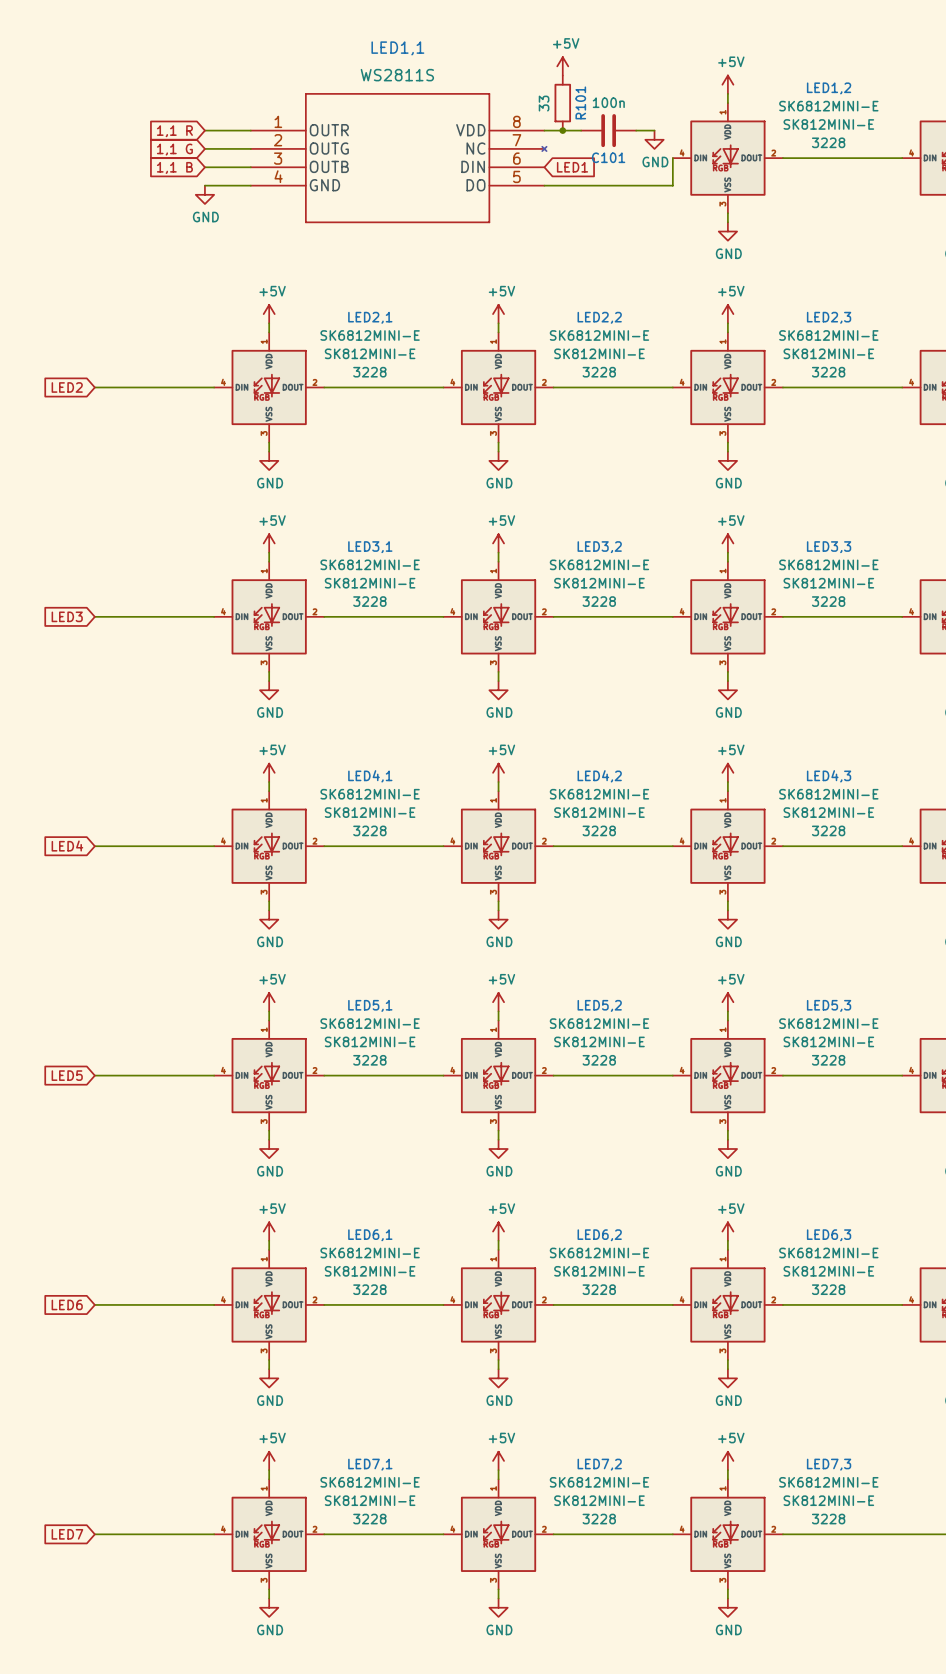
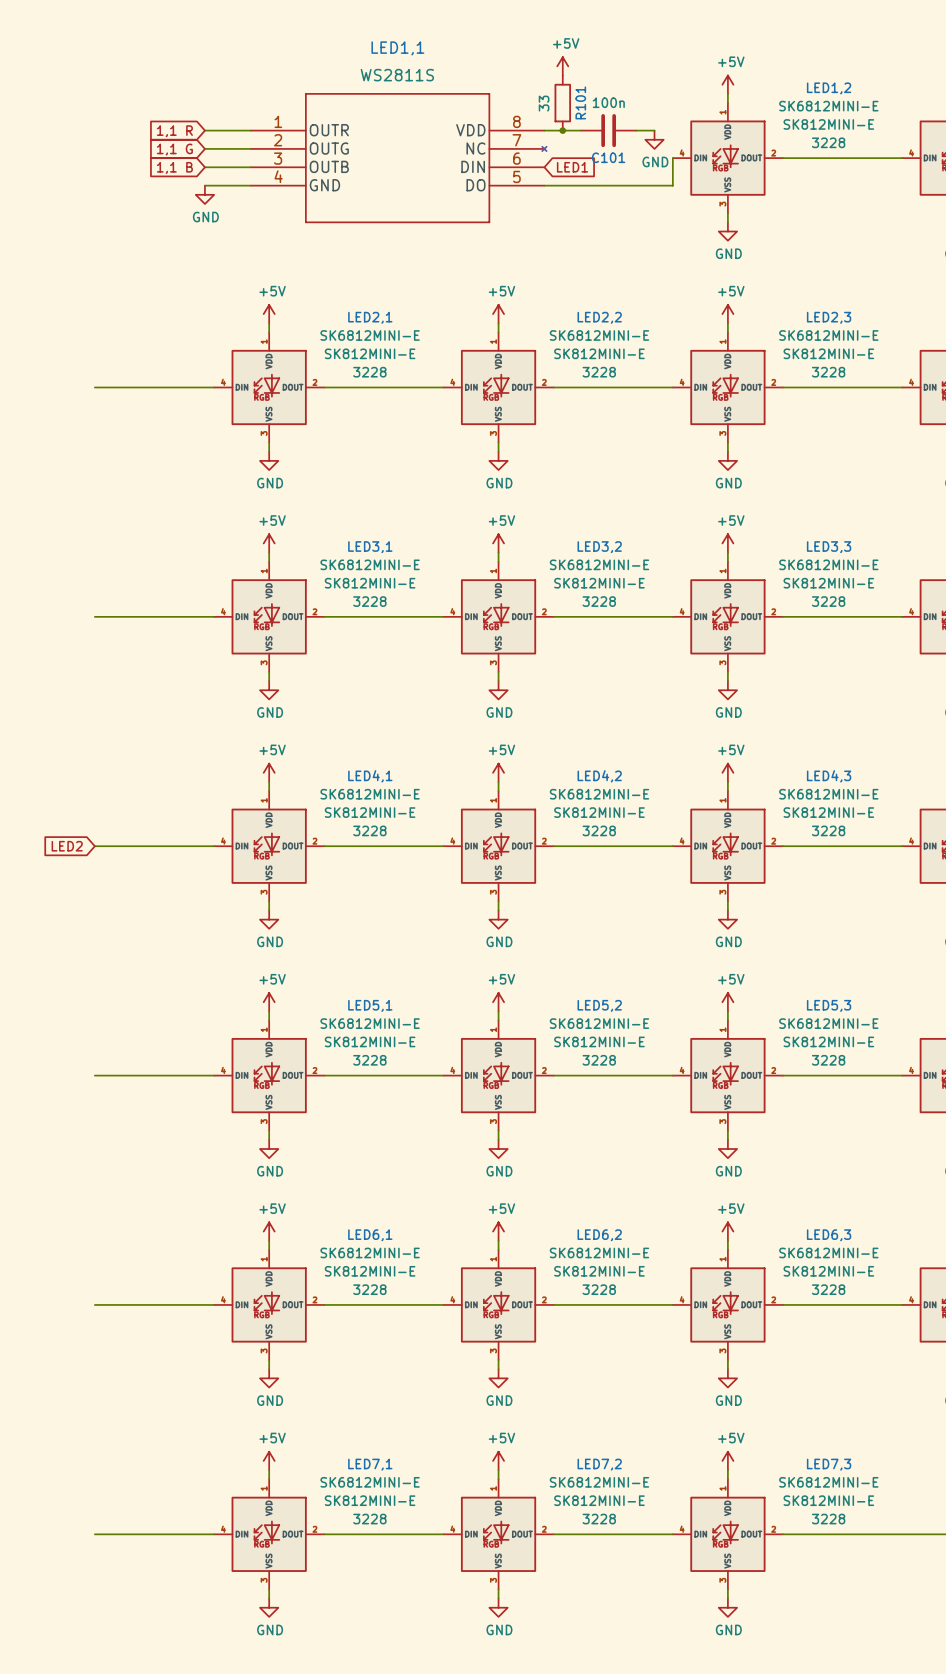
global label: LED2 (67, 387) -> none
global label: LED3 (67, 616) -> none
global label: LED4 (67, 846) -> LED2 (67, 846)
global label: LED5 (67, 1075) -> none
global label: LED6 (67, 1304) -> none
global label: LED7 (67, 1534) -> none

